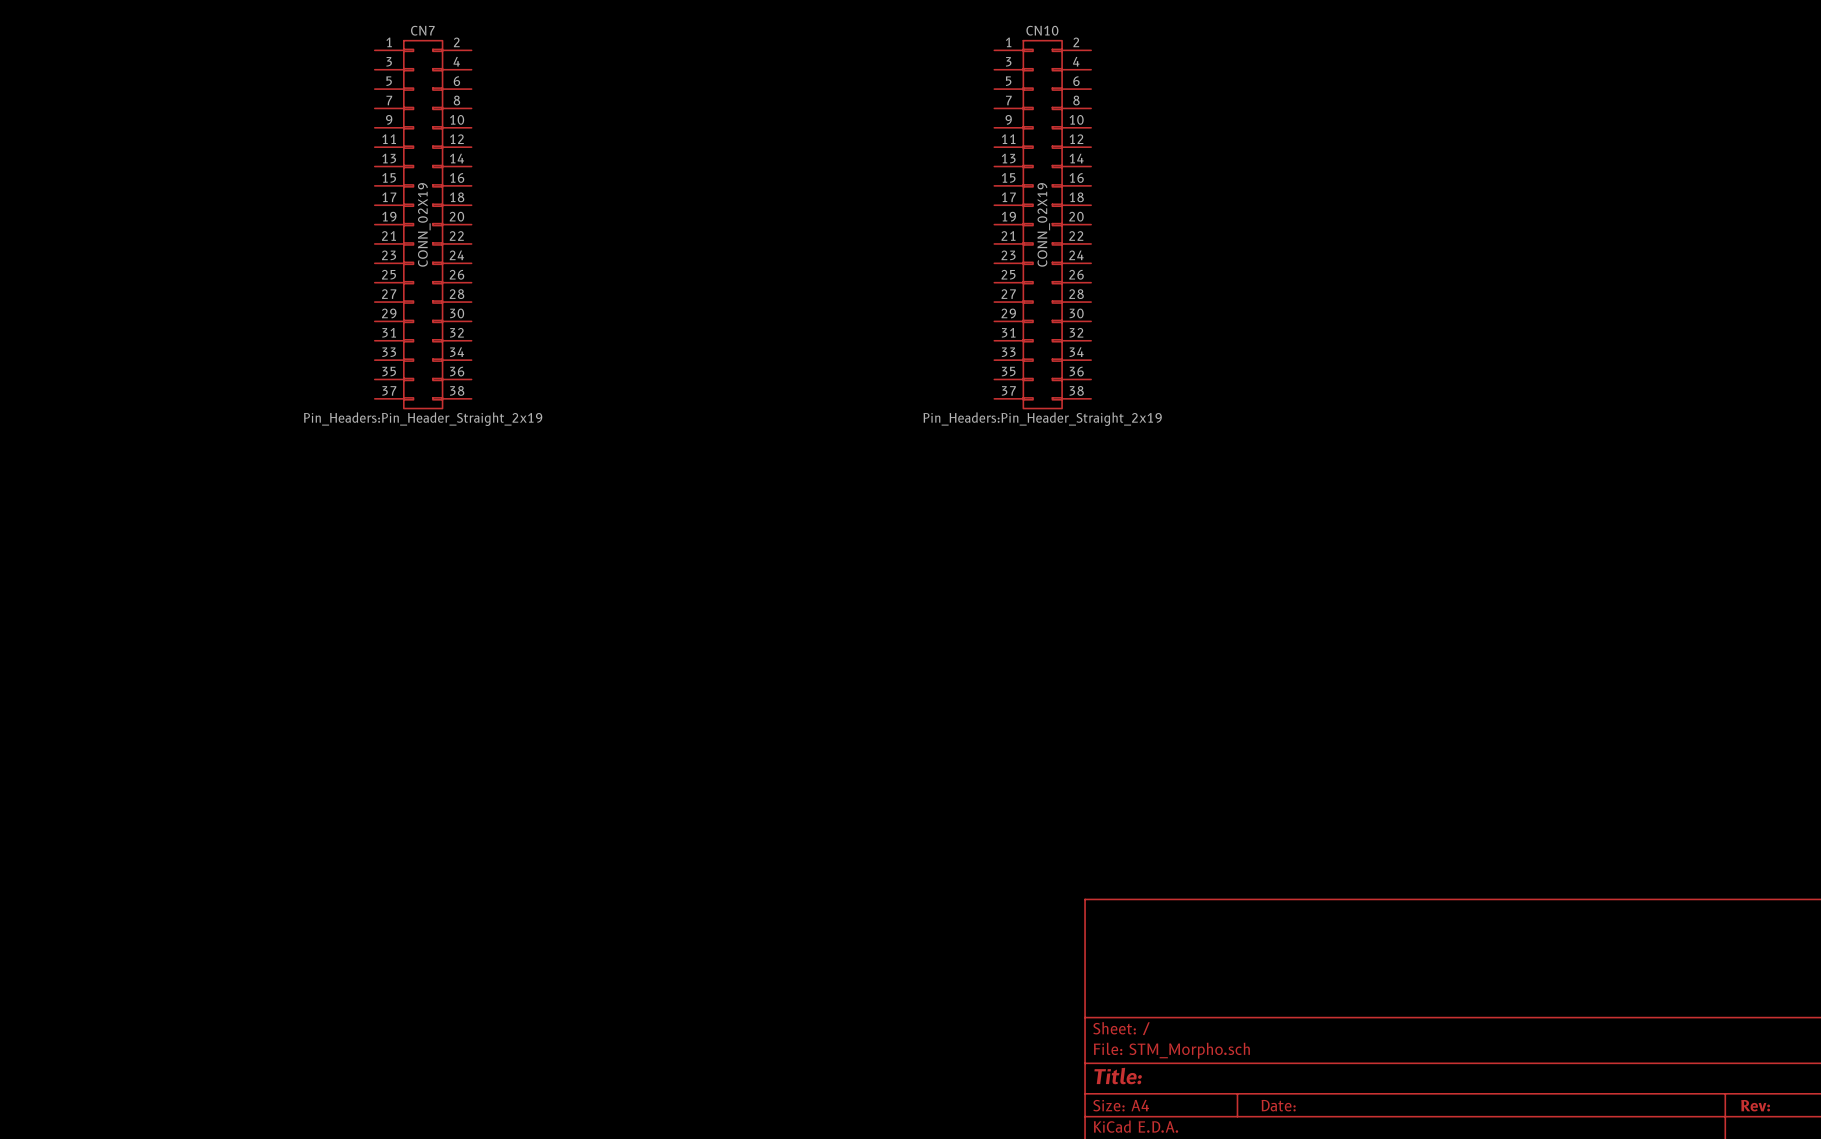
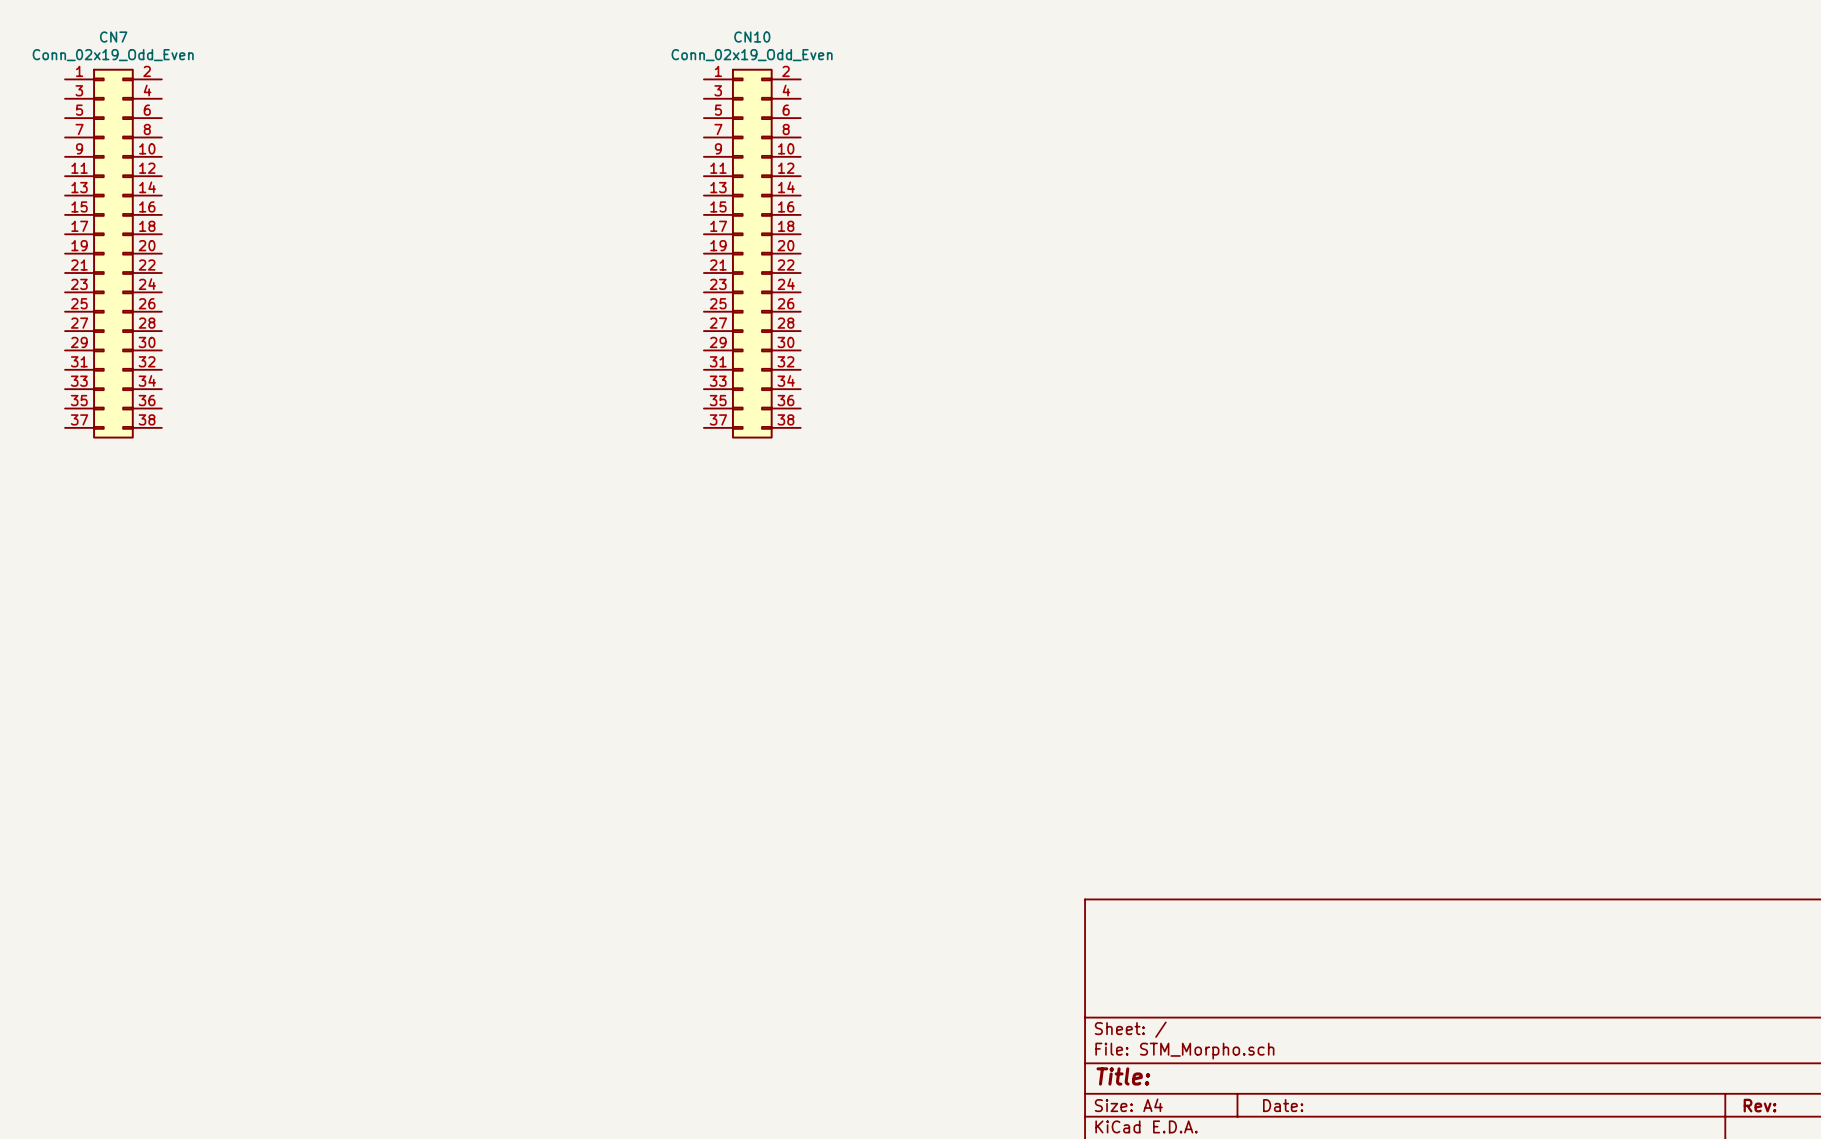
CN7 name position: CN7 (422, 30) -> CN7 (113, 37)
CN10 name position: CN10 (1042, 30) -> CN10 (752, 37)
CN7 symbol: [374, 40, 472, 409] -> [65, 68, 162, 439]
CN10 symbol: [994, 40, 1092, 409] -> [703, 68, 801, 439]
CN7 value: CONN_02X19 (424, 224) -> Conn_02x19_Odd_Even (113, 55)
CN10 value: CONN_02X19 (1043, 224) -> Conn_02x19_Odd_Even (752, 55)
CN7 text: Pin_Headers:Pin_Header_Straight_2x19 (423, 419) -> none
CN10 text: Pin_Headers:Pin_Header_Straight_2x19 (1042, 419) -> none

